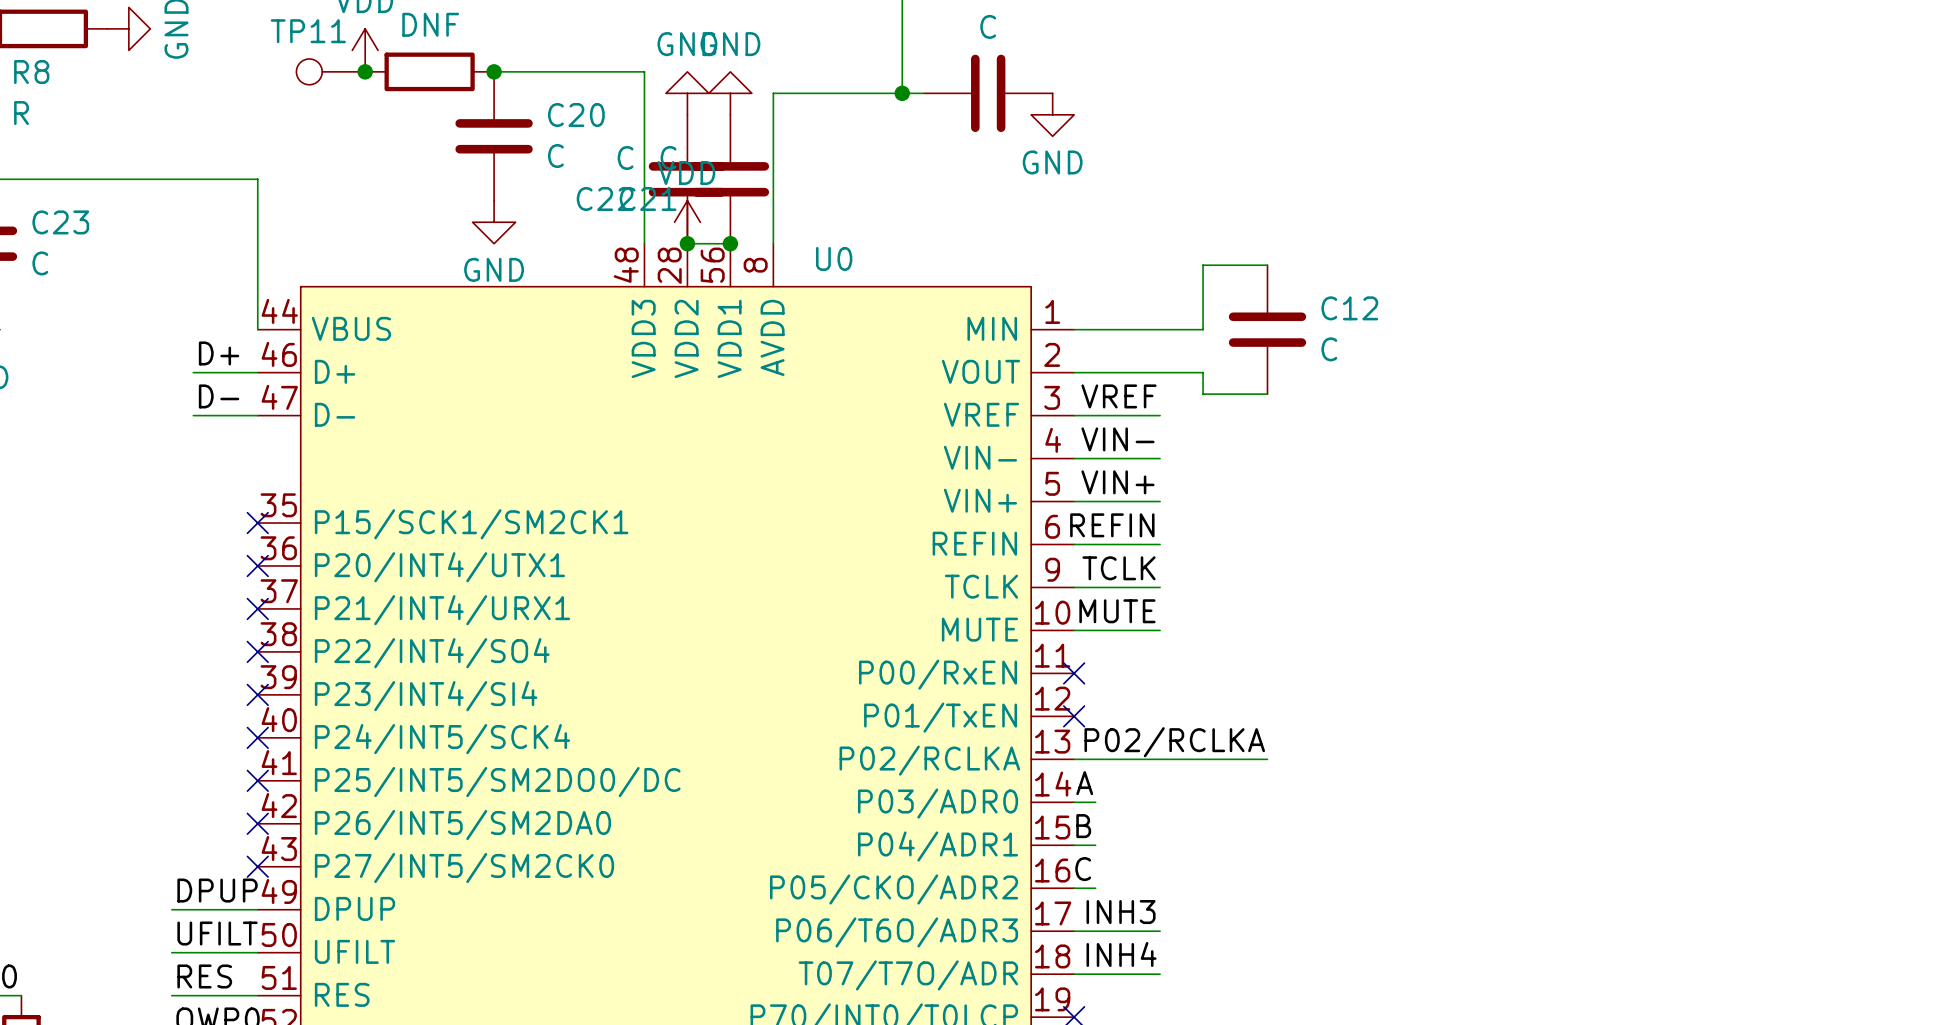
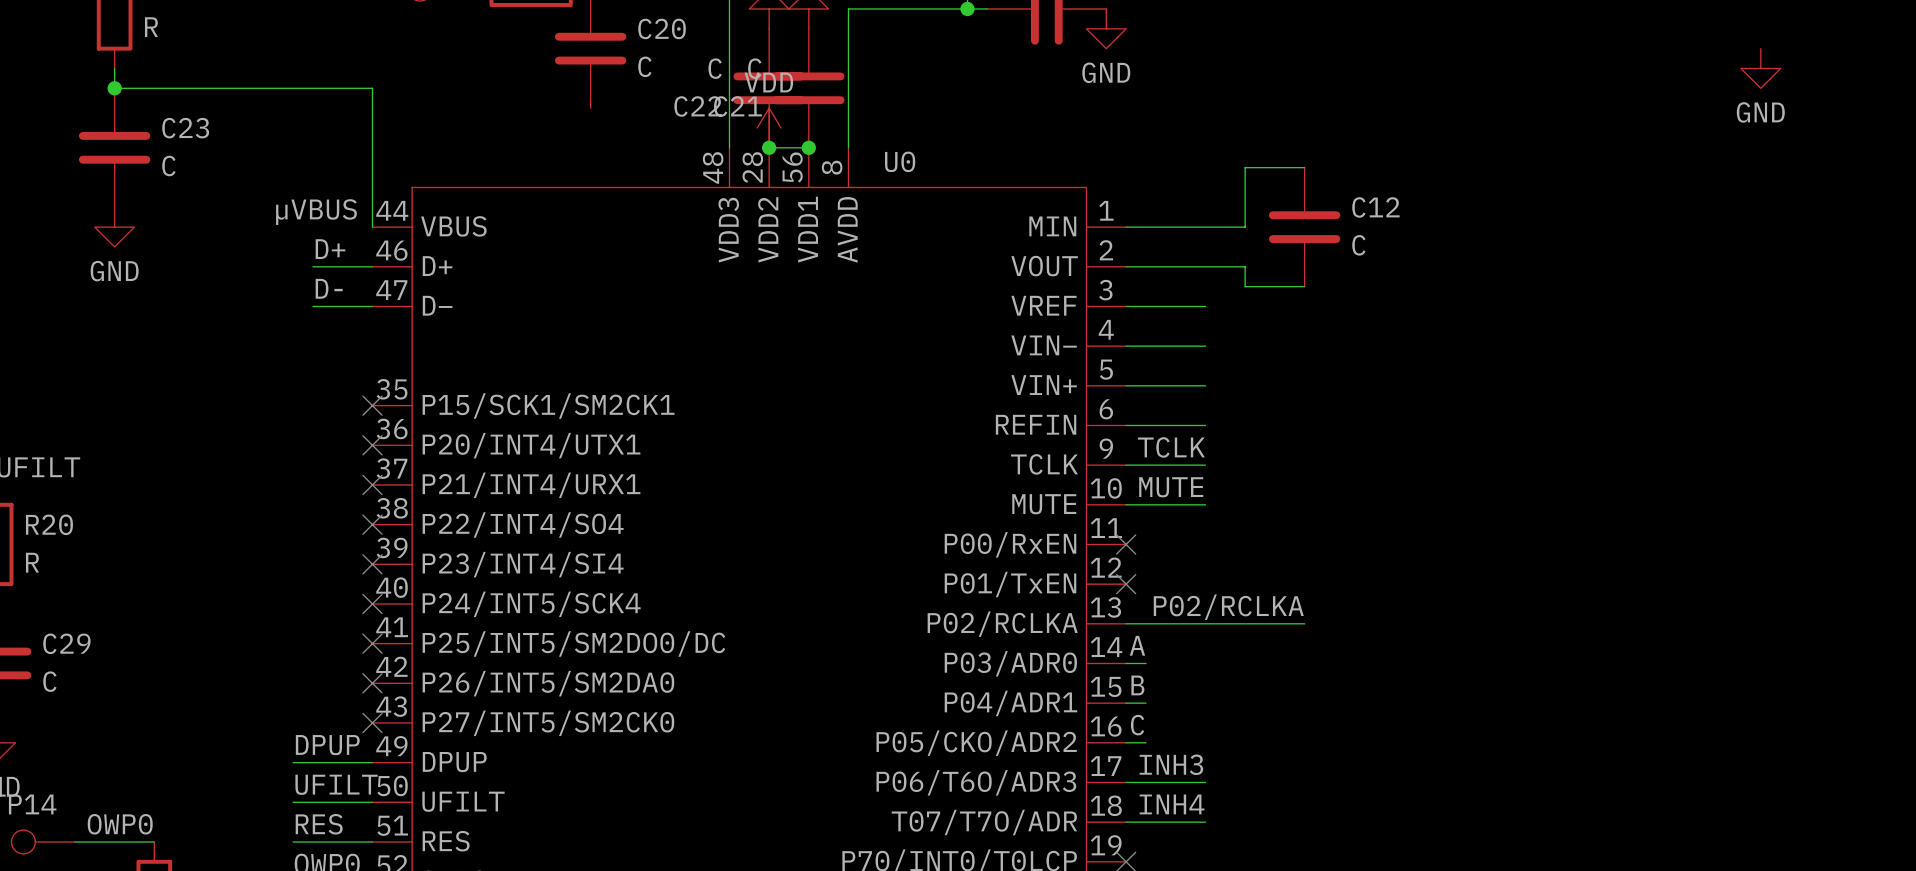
power symbol: none -> GND (1760, 68)
power symbol: GND (494, 222) -> none
label: none -> µVBUS (316, 212)
label: VREF (1118, 396) -> none
label: VIN- (1117, 439) -> none
label: VIN+ (1117, 482) -> none
label: REFIN (1112, 525) -> none

